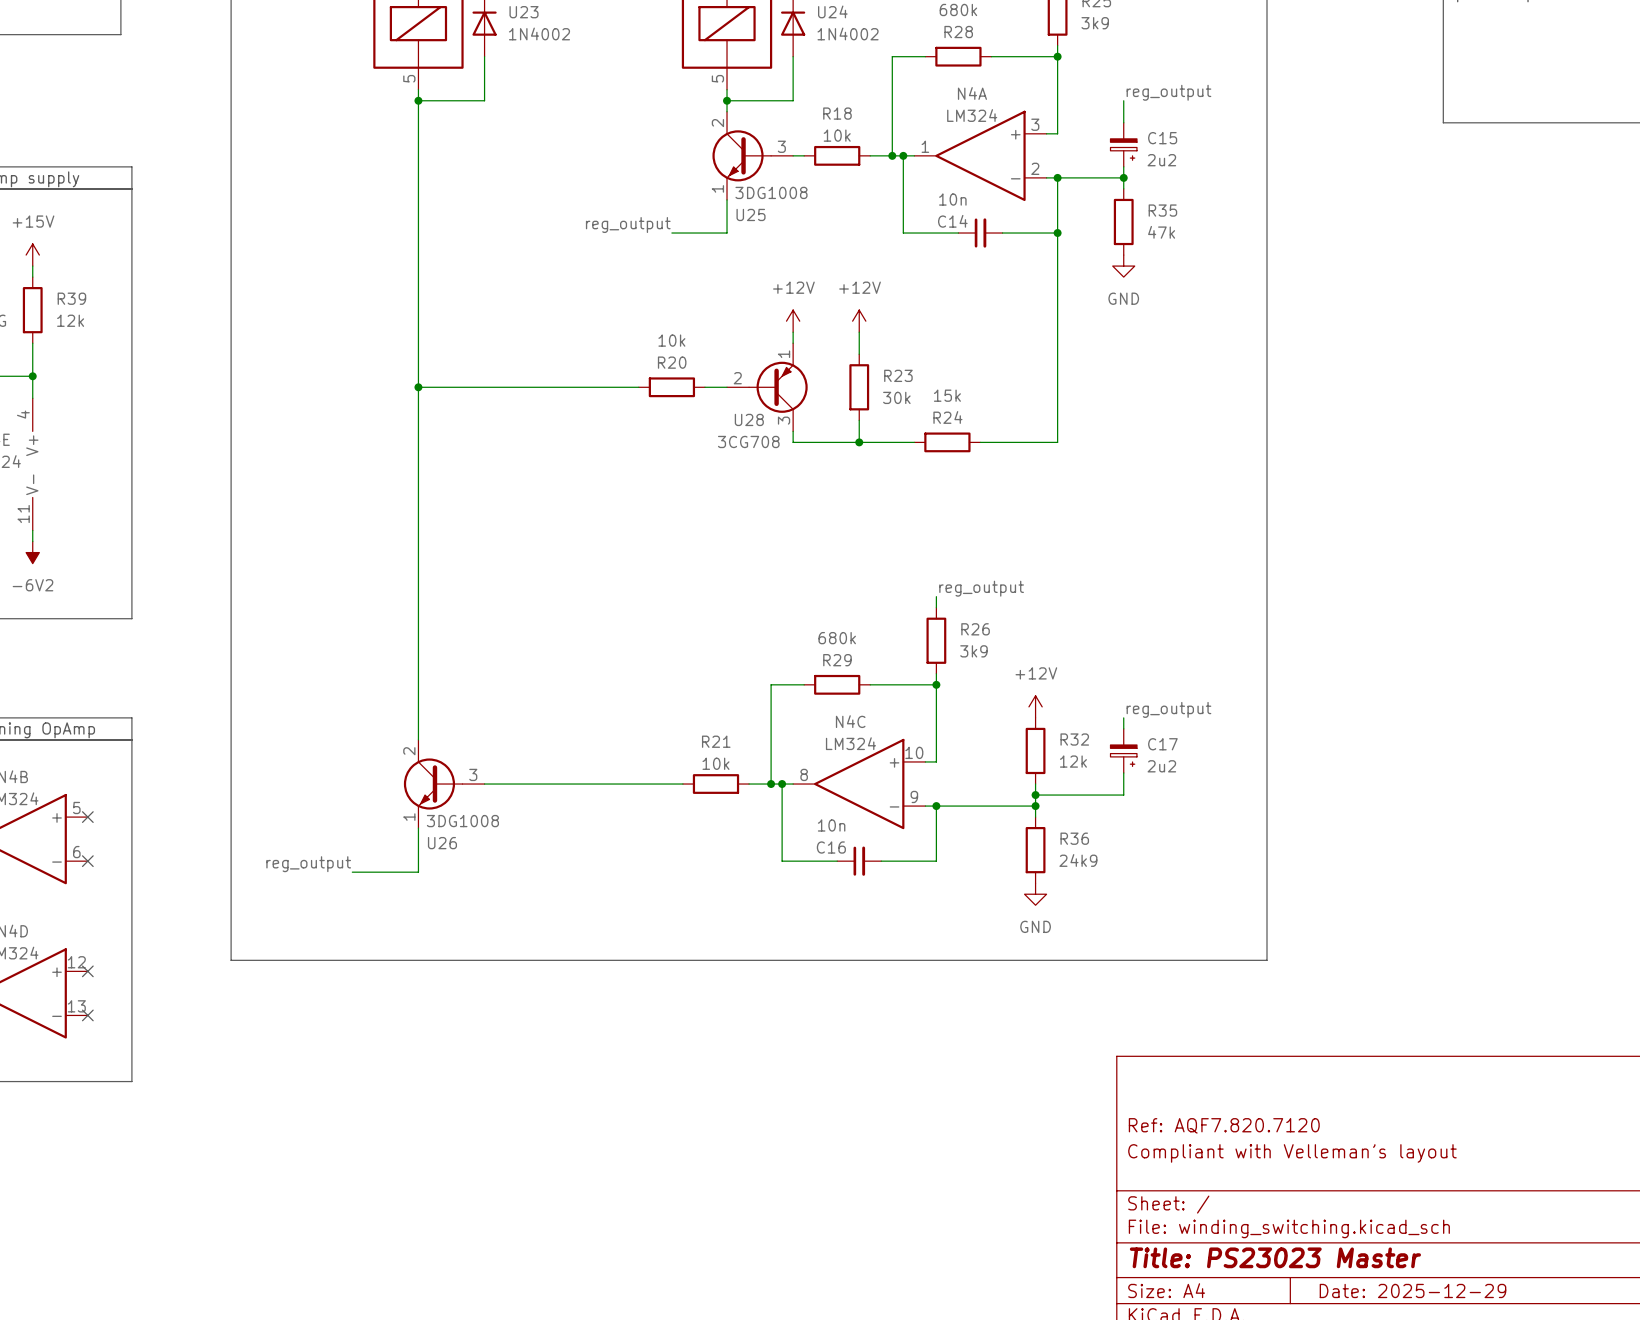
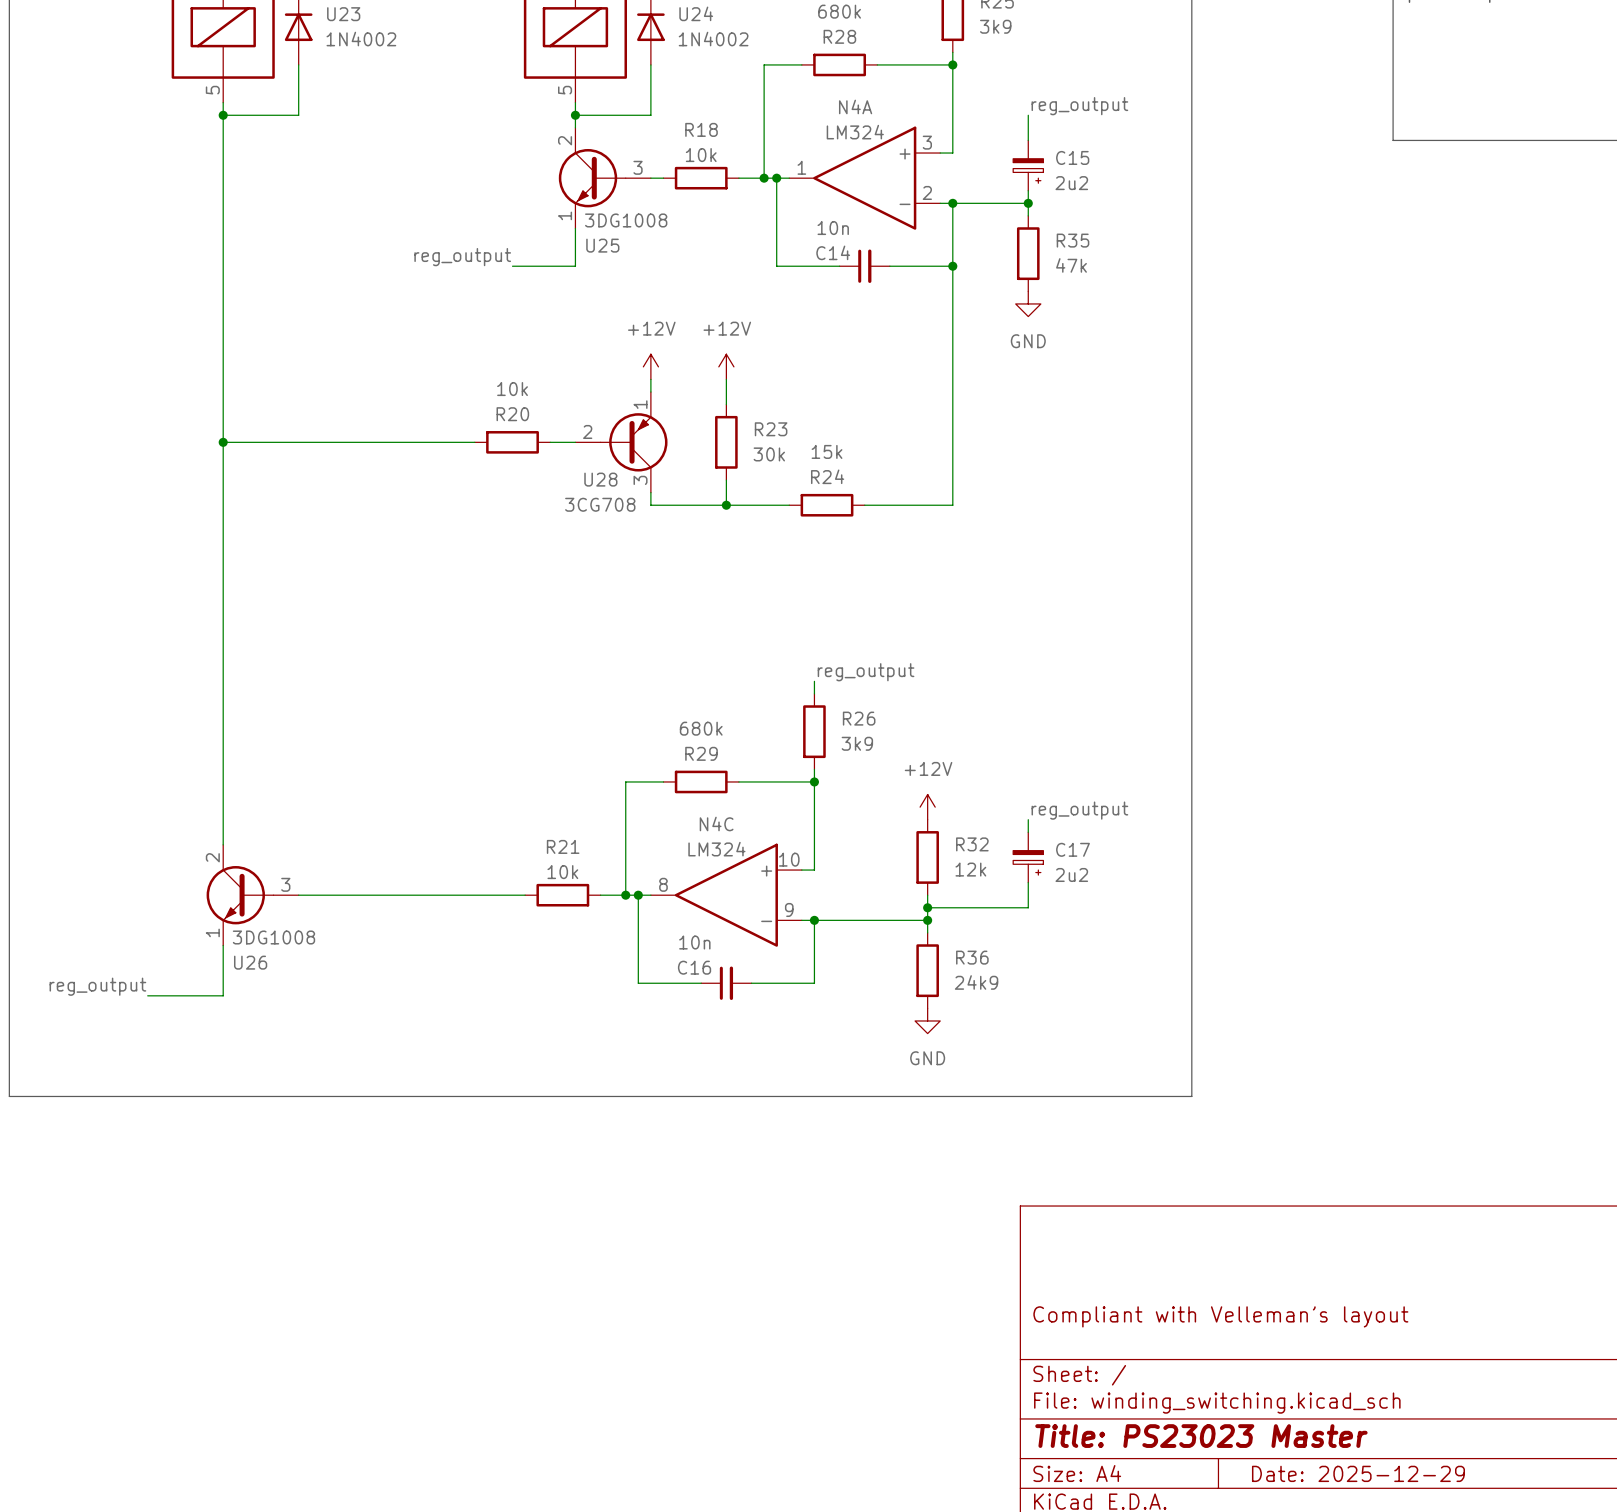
title block: Ref: AQF7.820.7120 (1224, 1125) -> none

